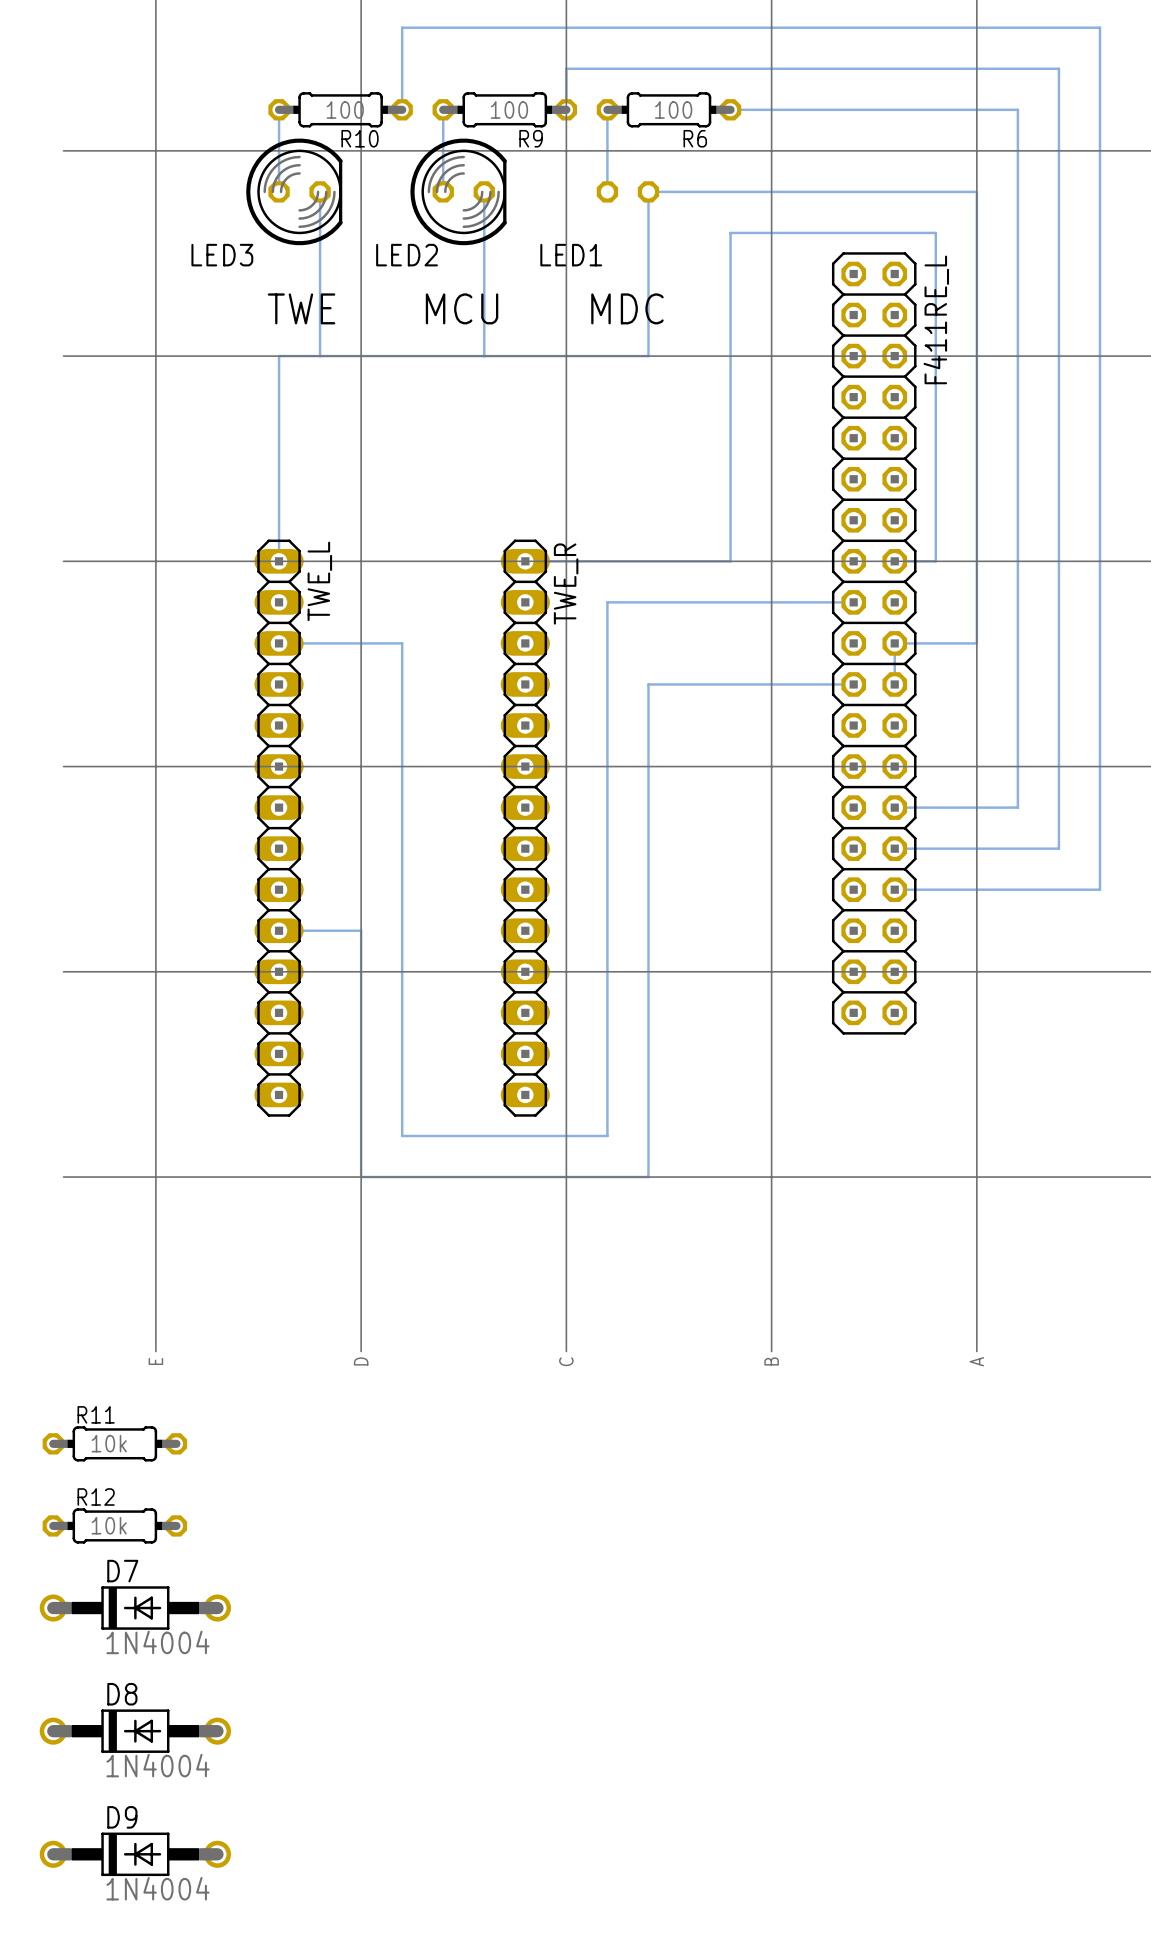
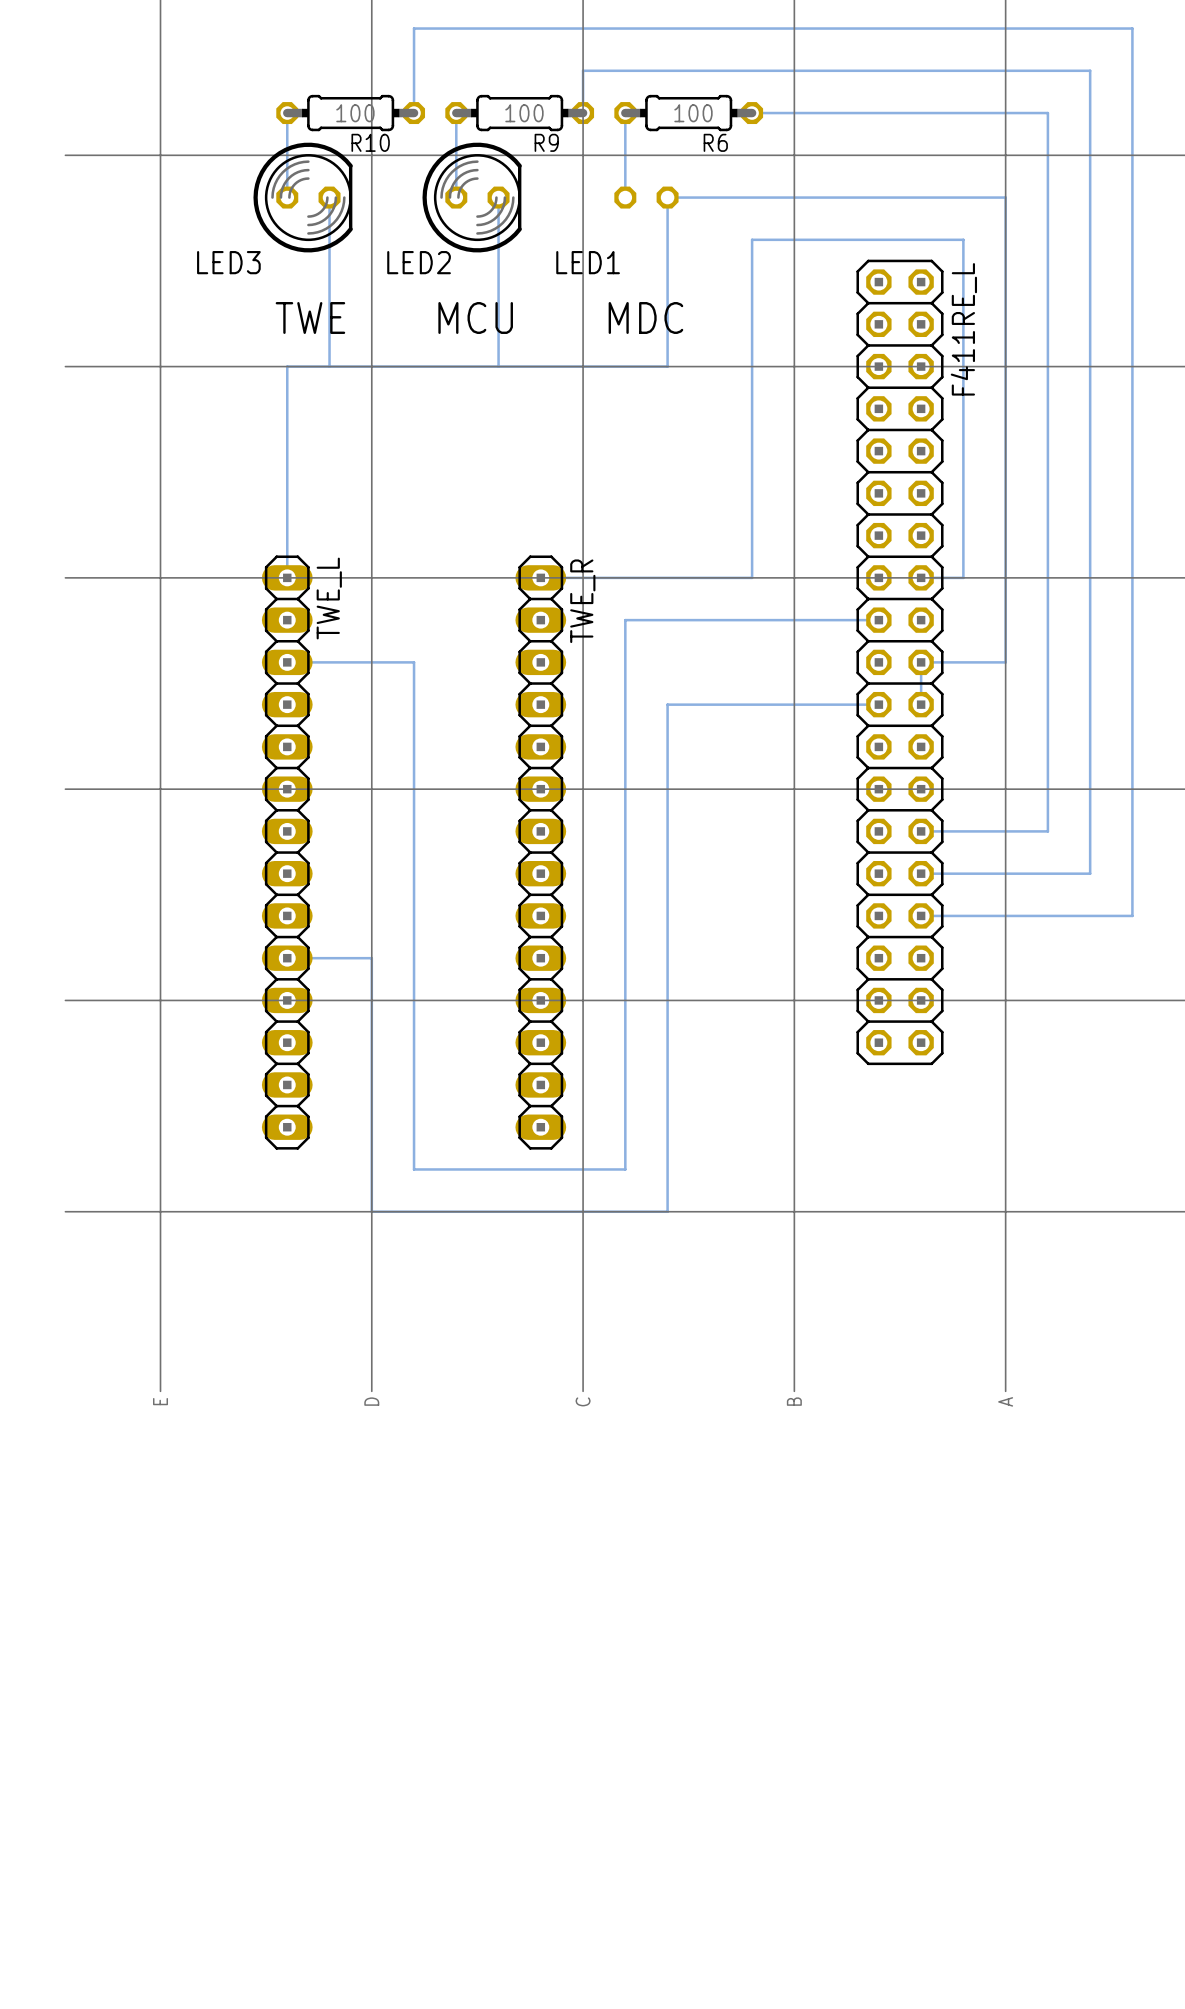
R11: 10k (114, 1443) -> none
R12: 10k (114, 1525) -> none
D7: 1N4004 (135, 1608) -> none
D8: 1N4004 (135, 1731) -> none
D9: 1N4004 (135, 1854) -> none

